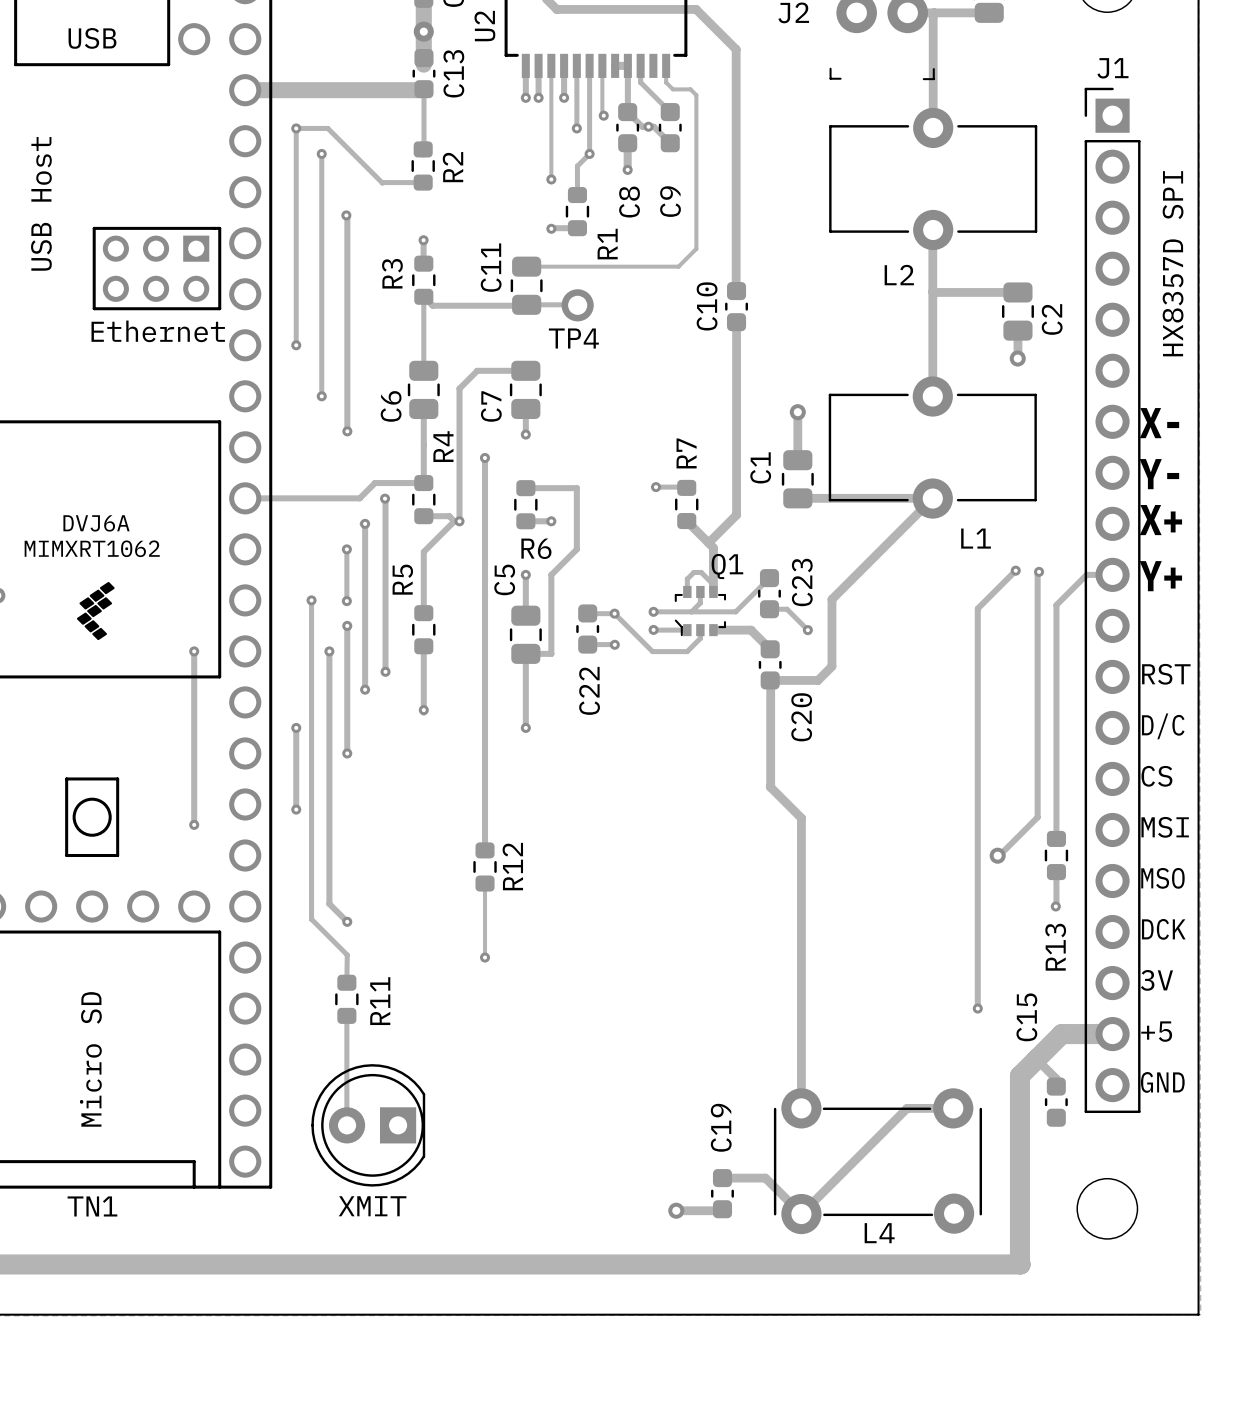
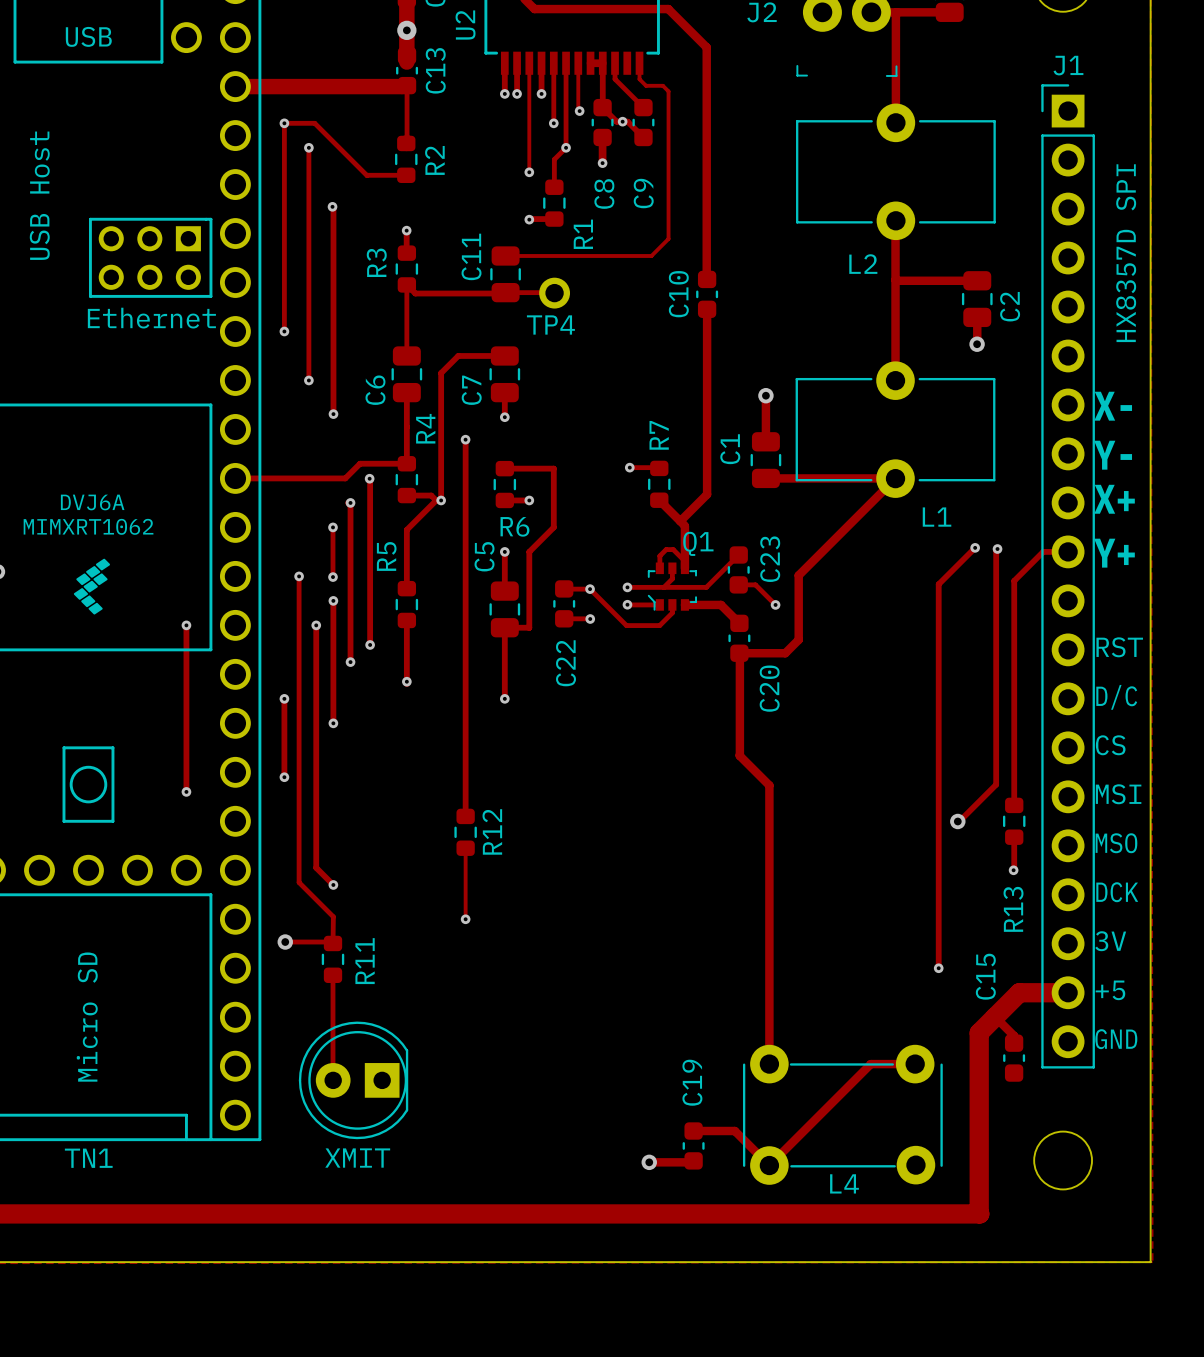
track: none -> (285, 942) (331, 942)
via: none -> (285, 942)

